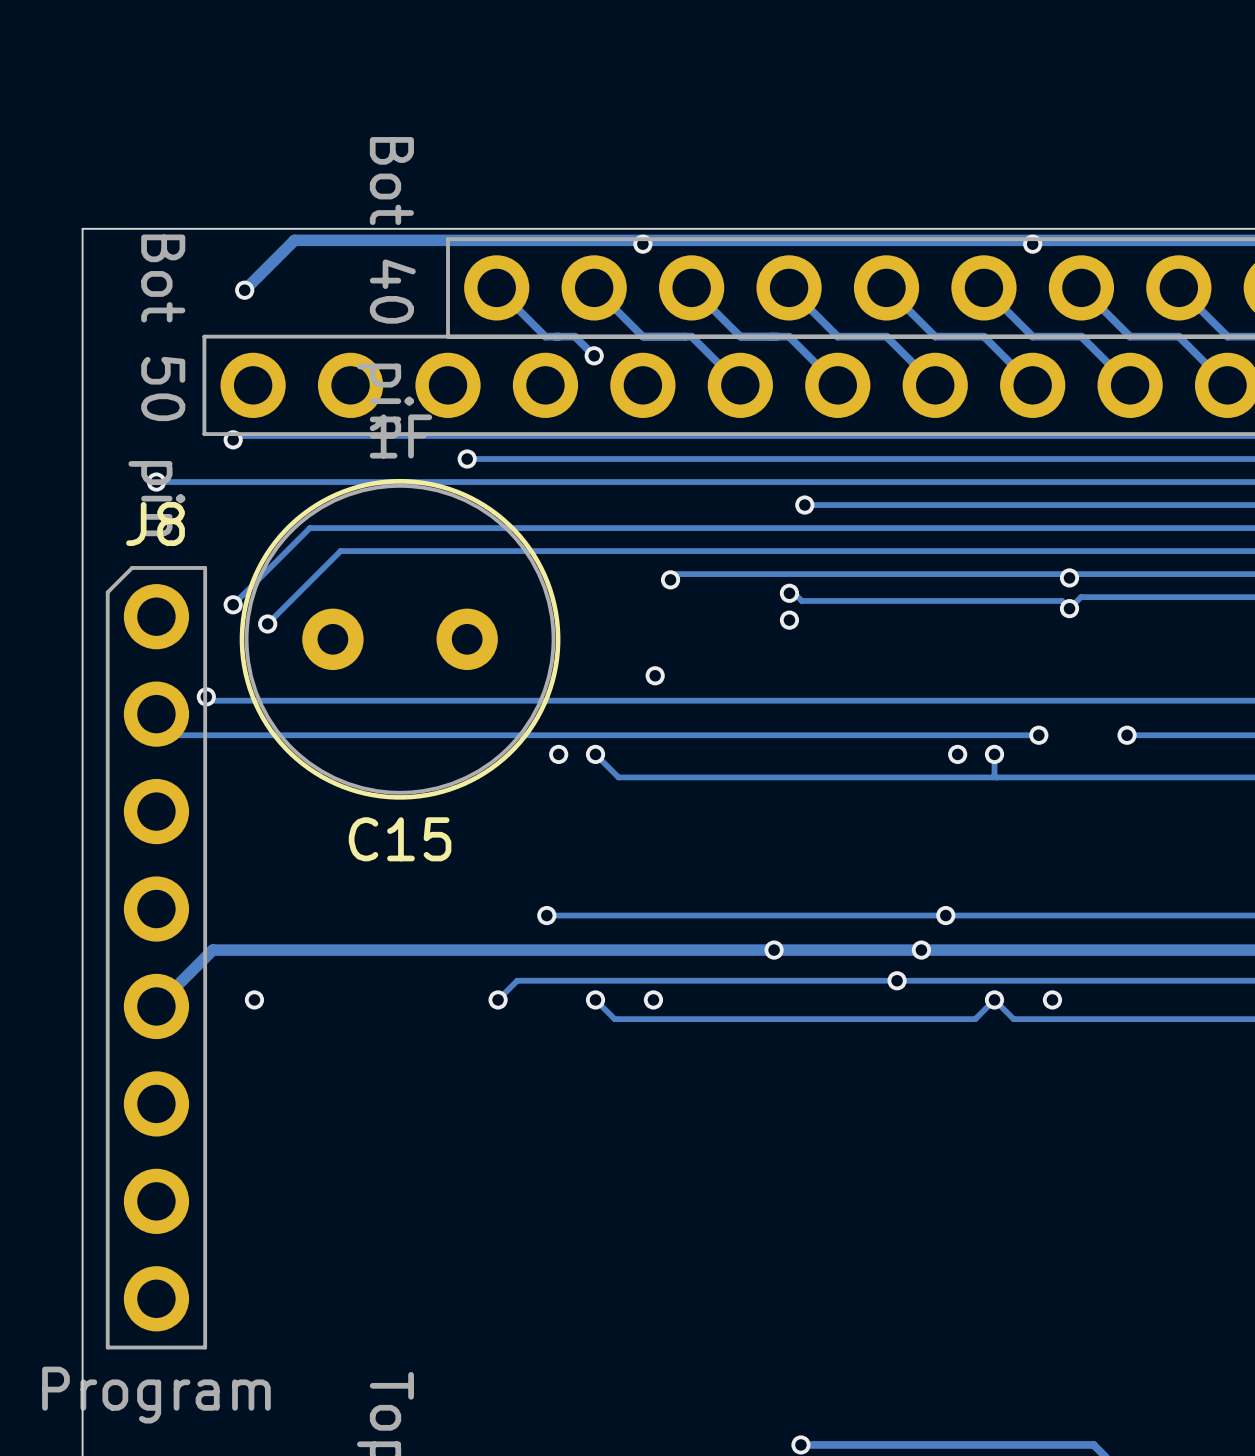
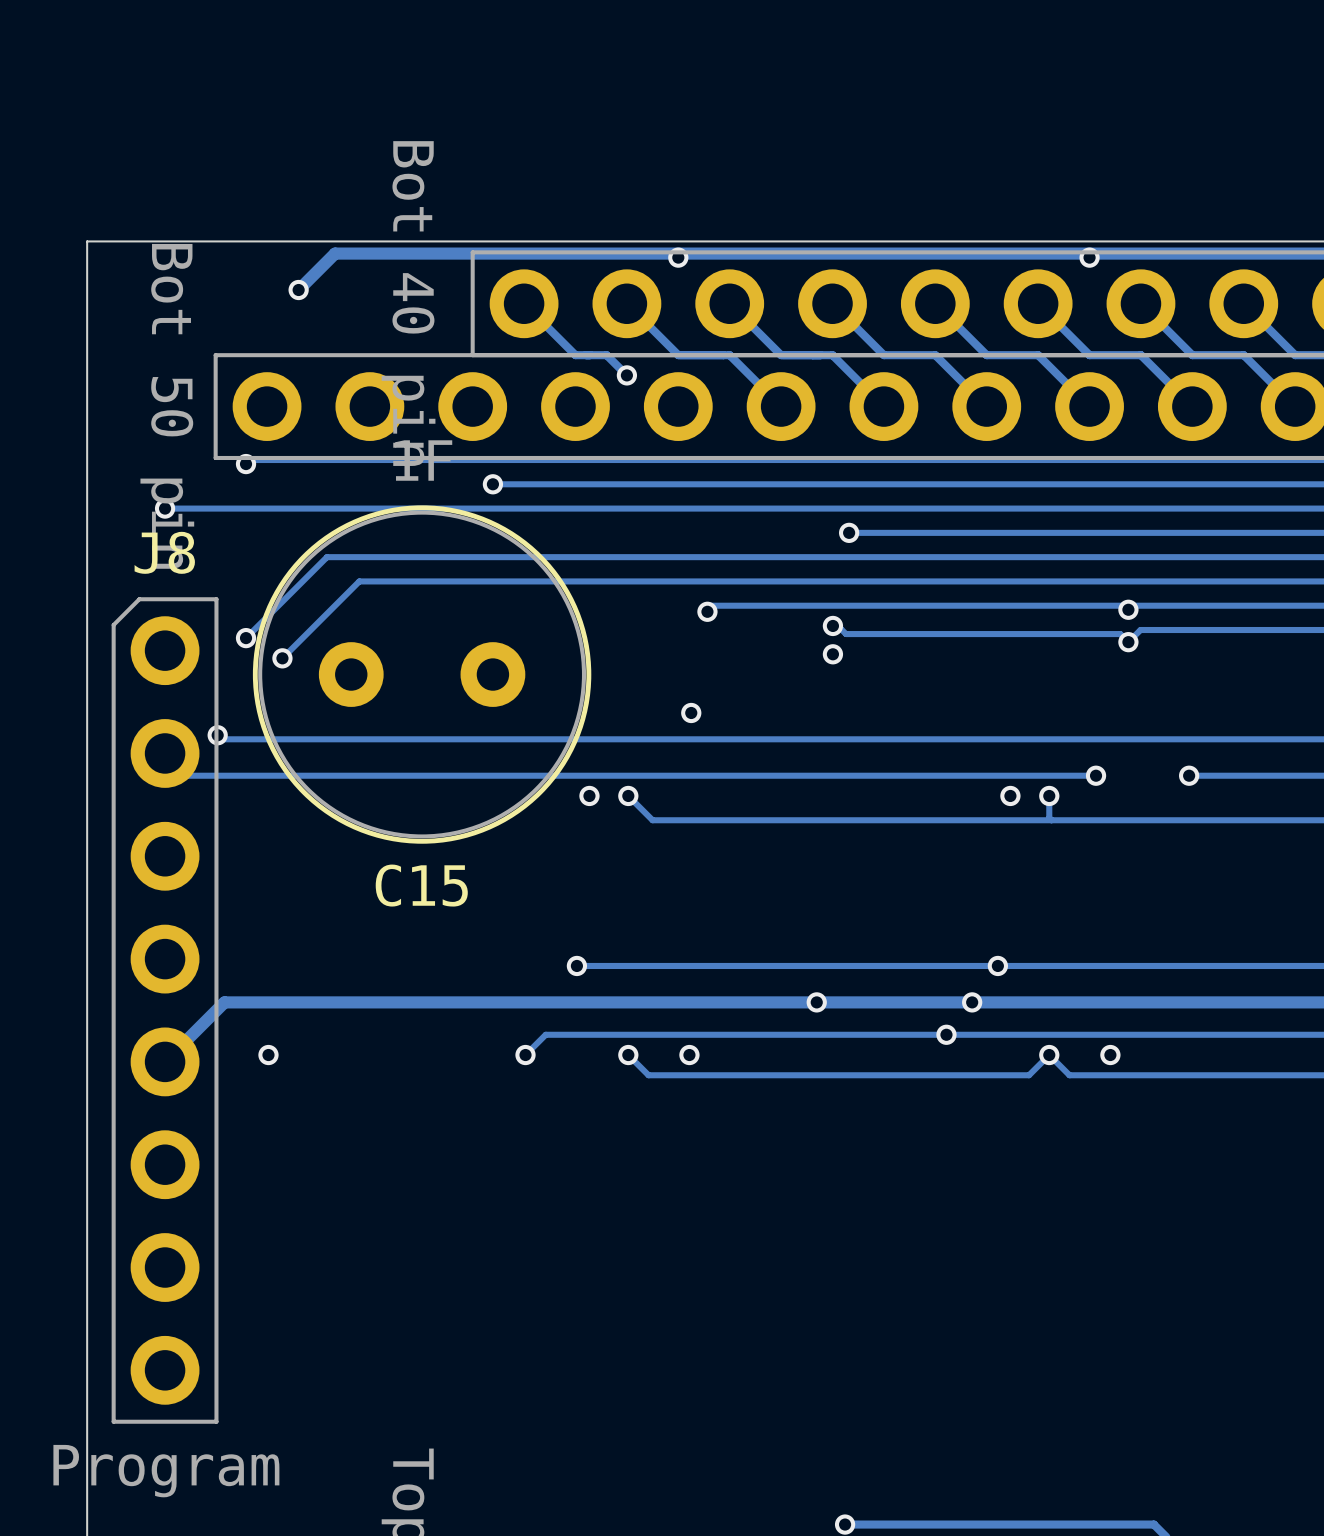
track: (317, 240) (294, 240) (244, 290) -> (335, 253) (298, 290)
via position: (244, 290) -> (298, 290)

